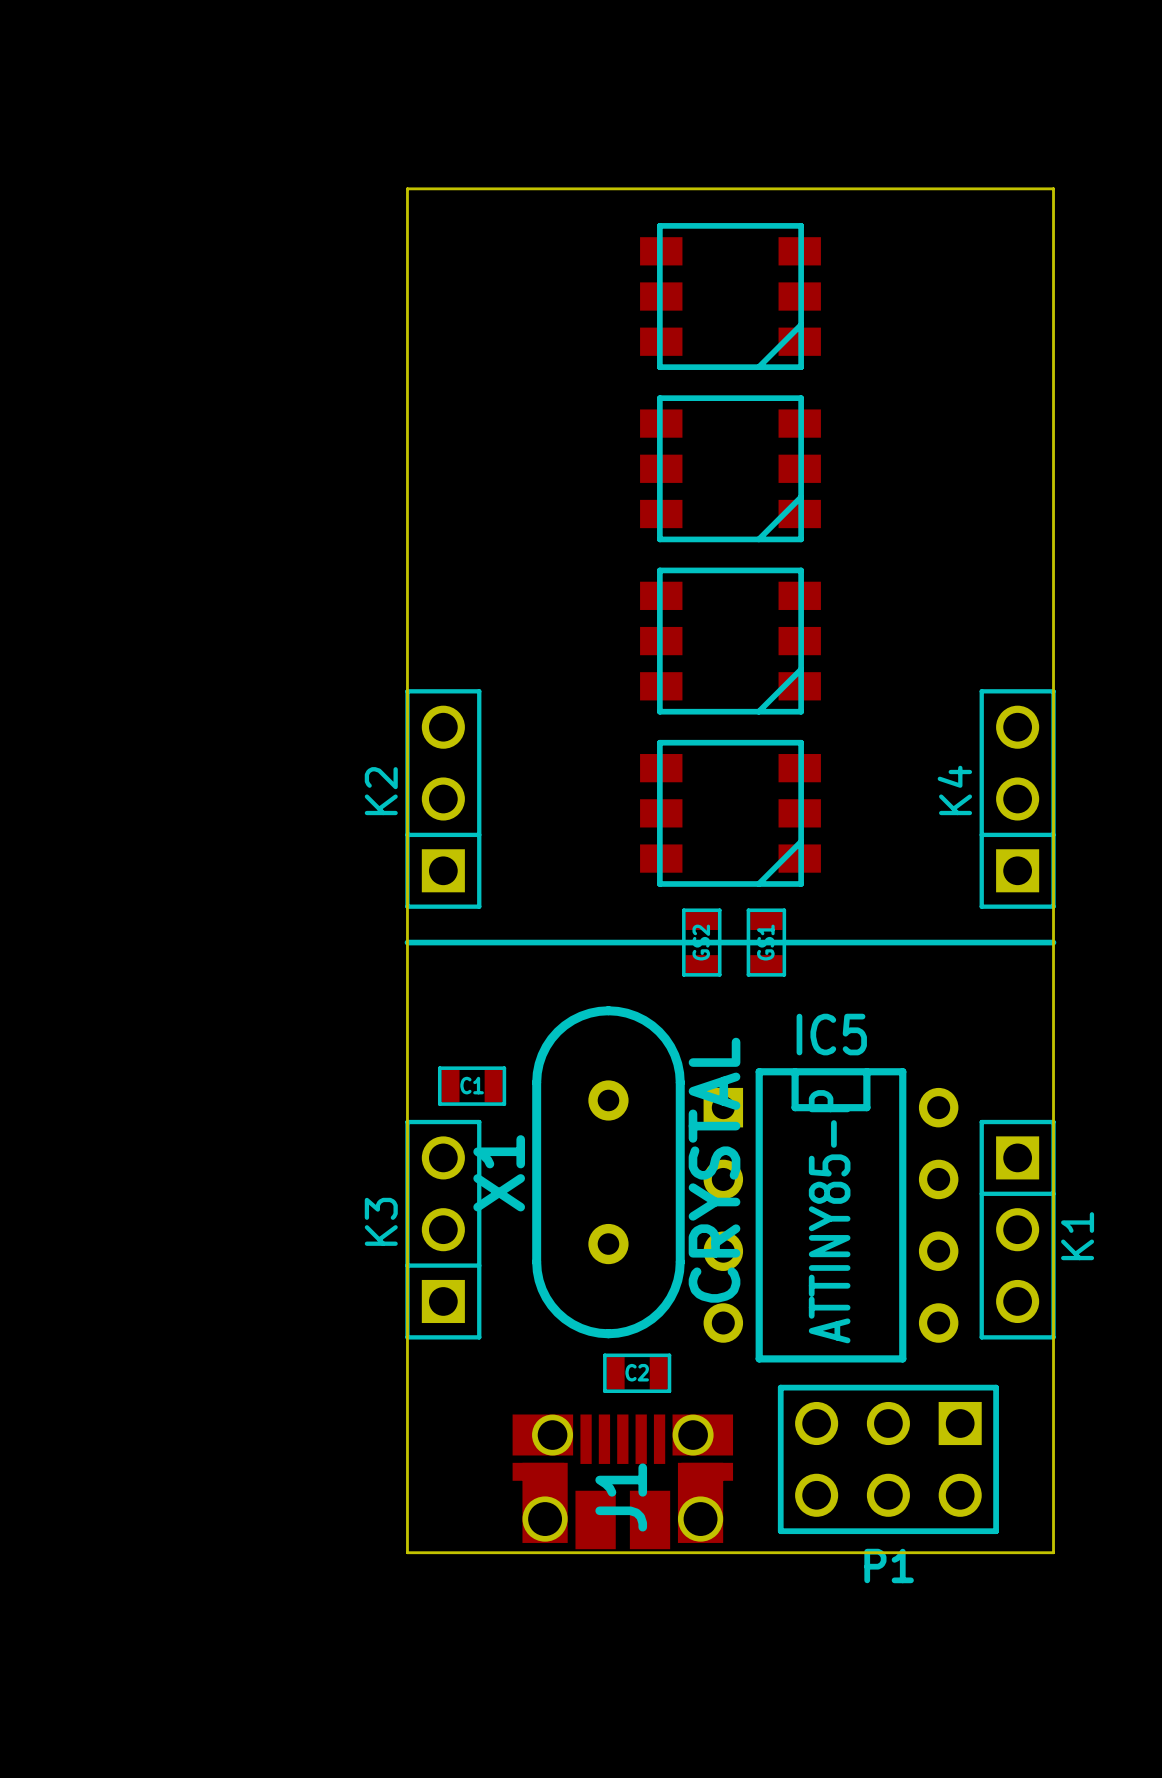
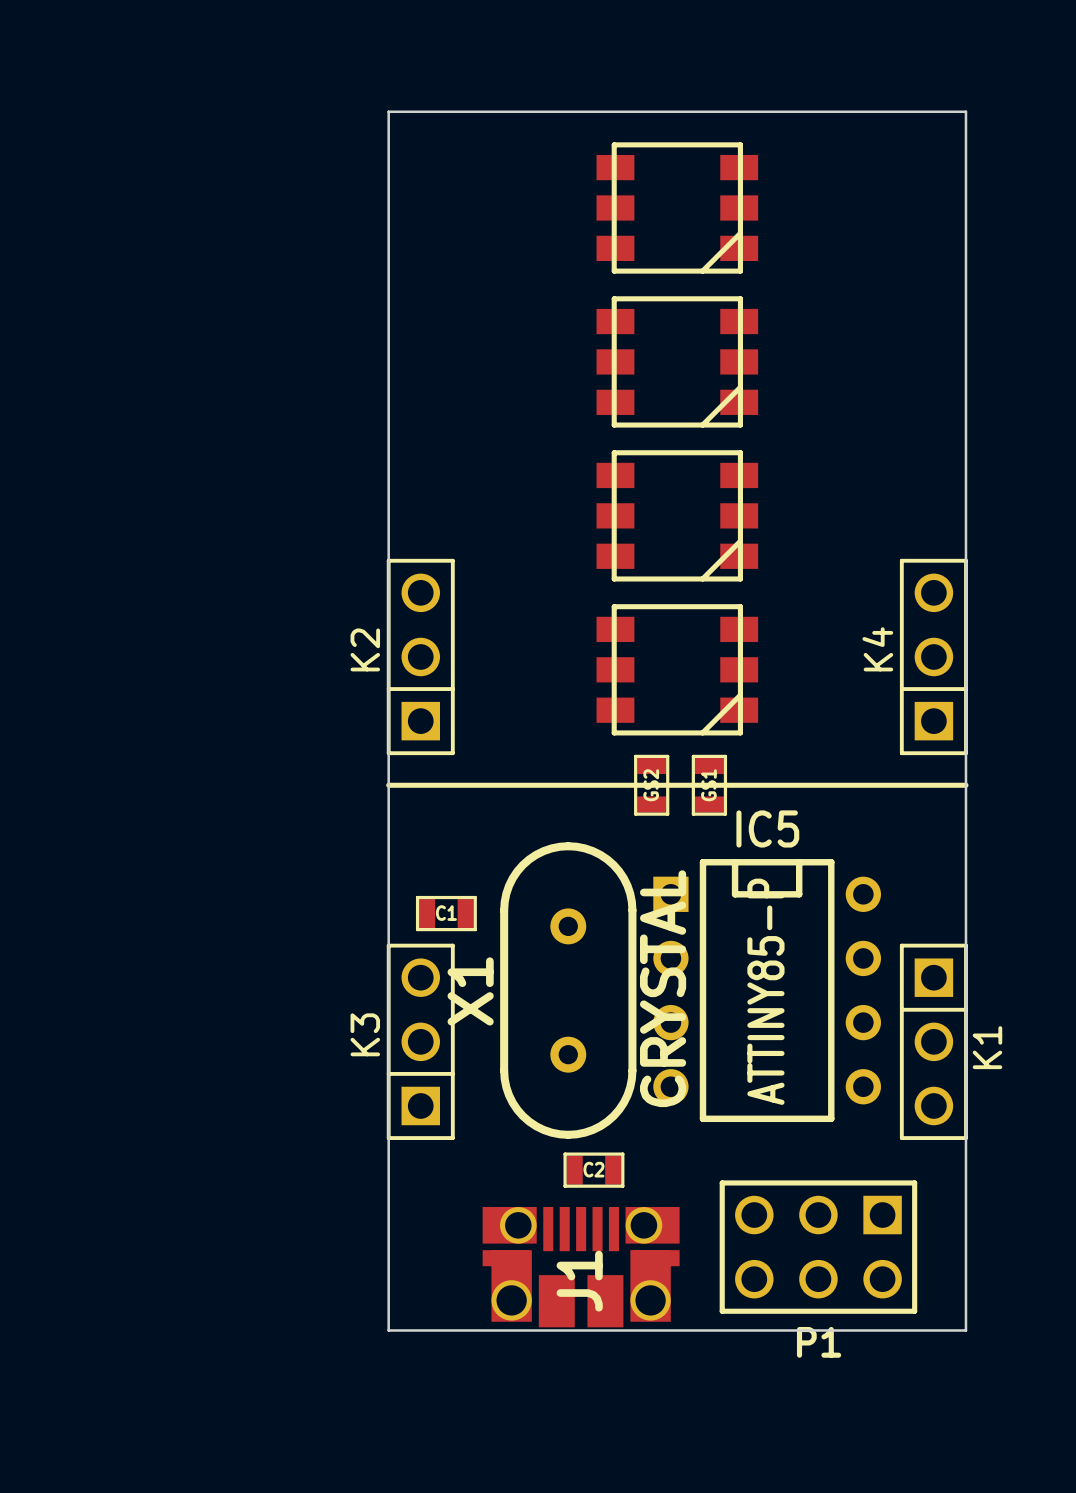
IC5 position: (830, 1215) -> (767, 990)

